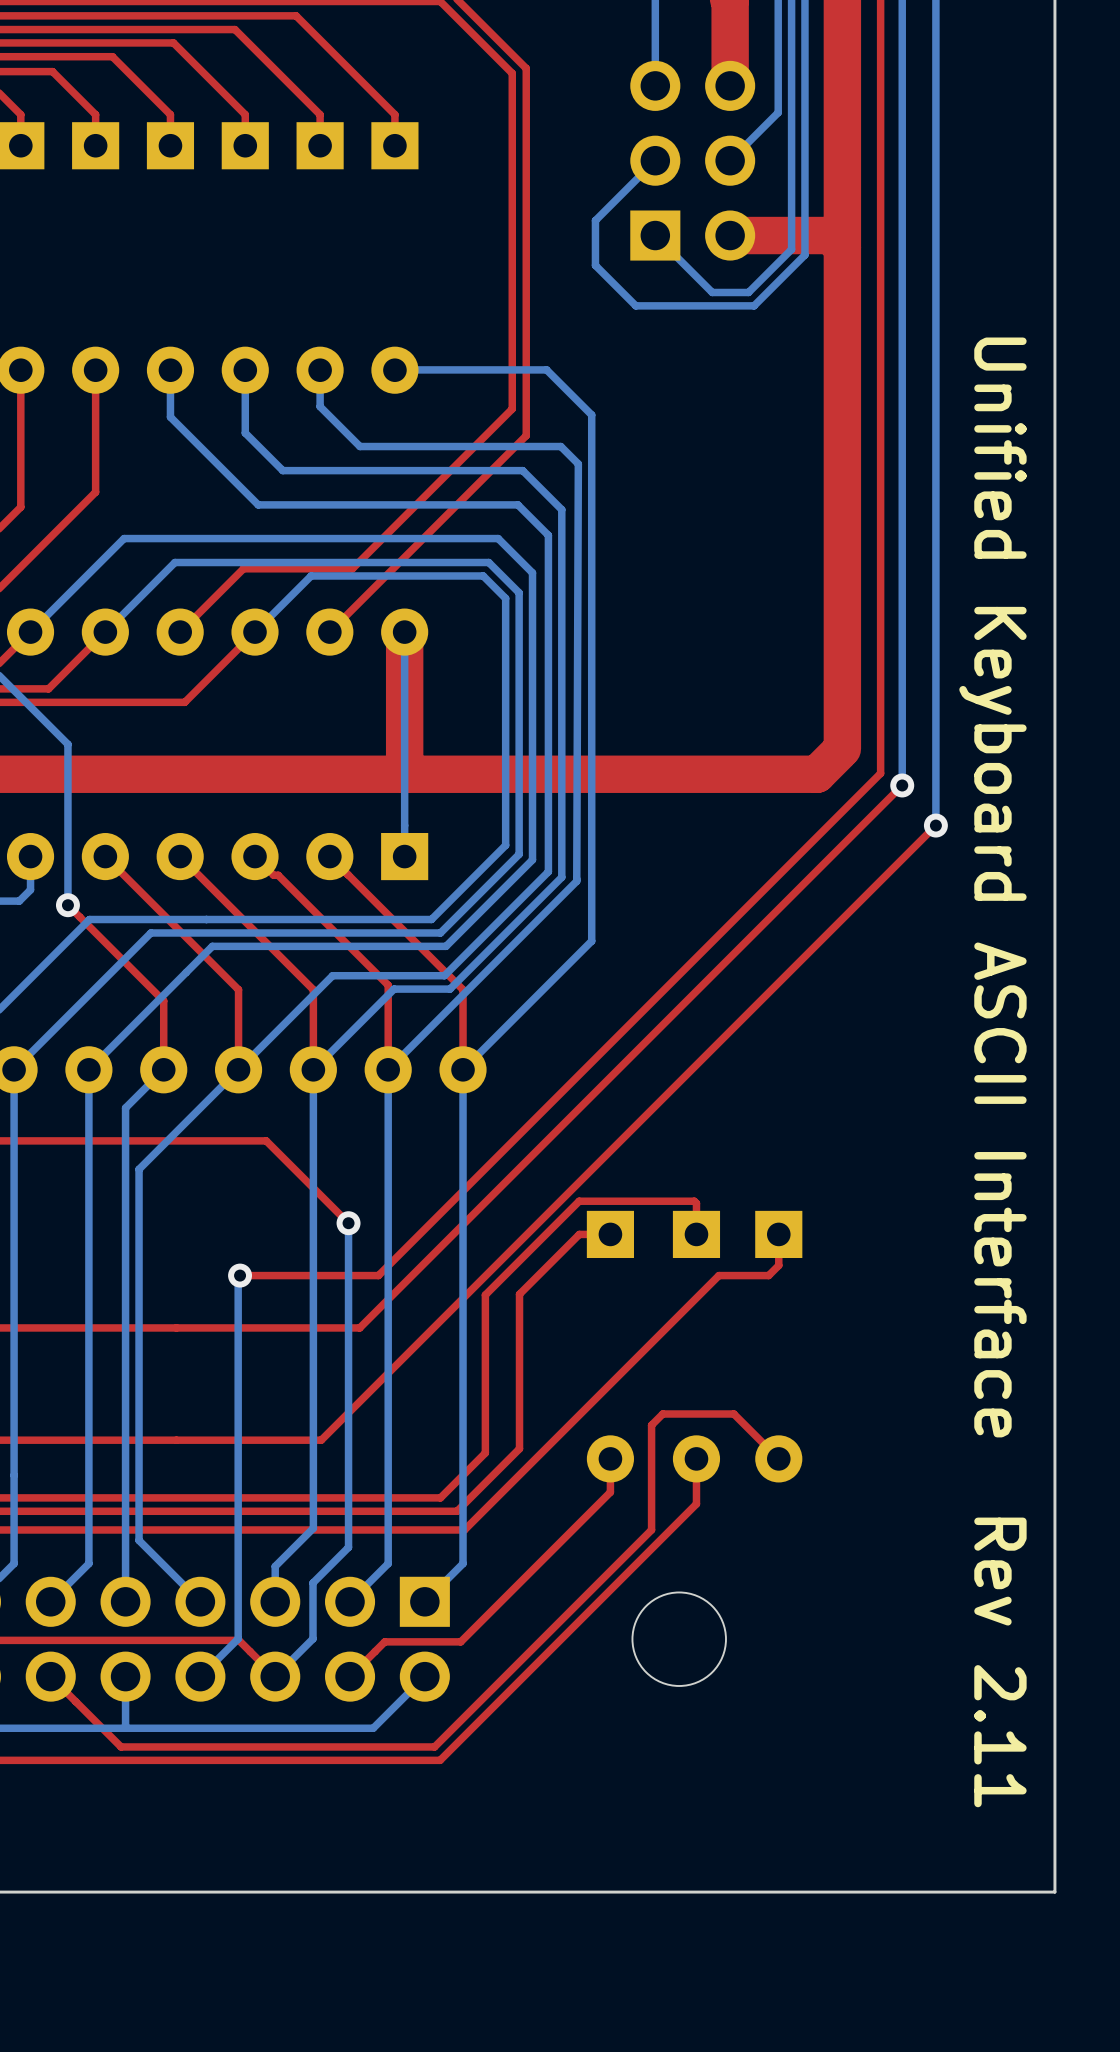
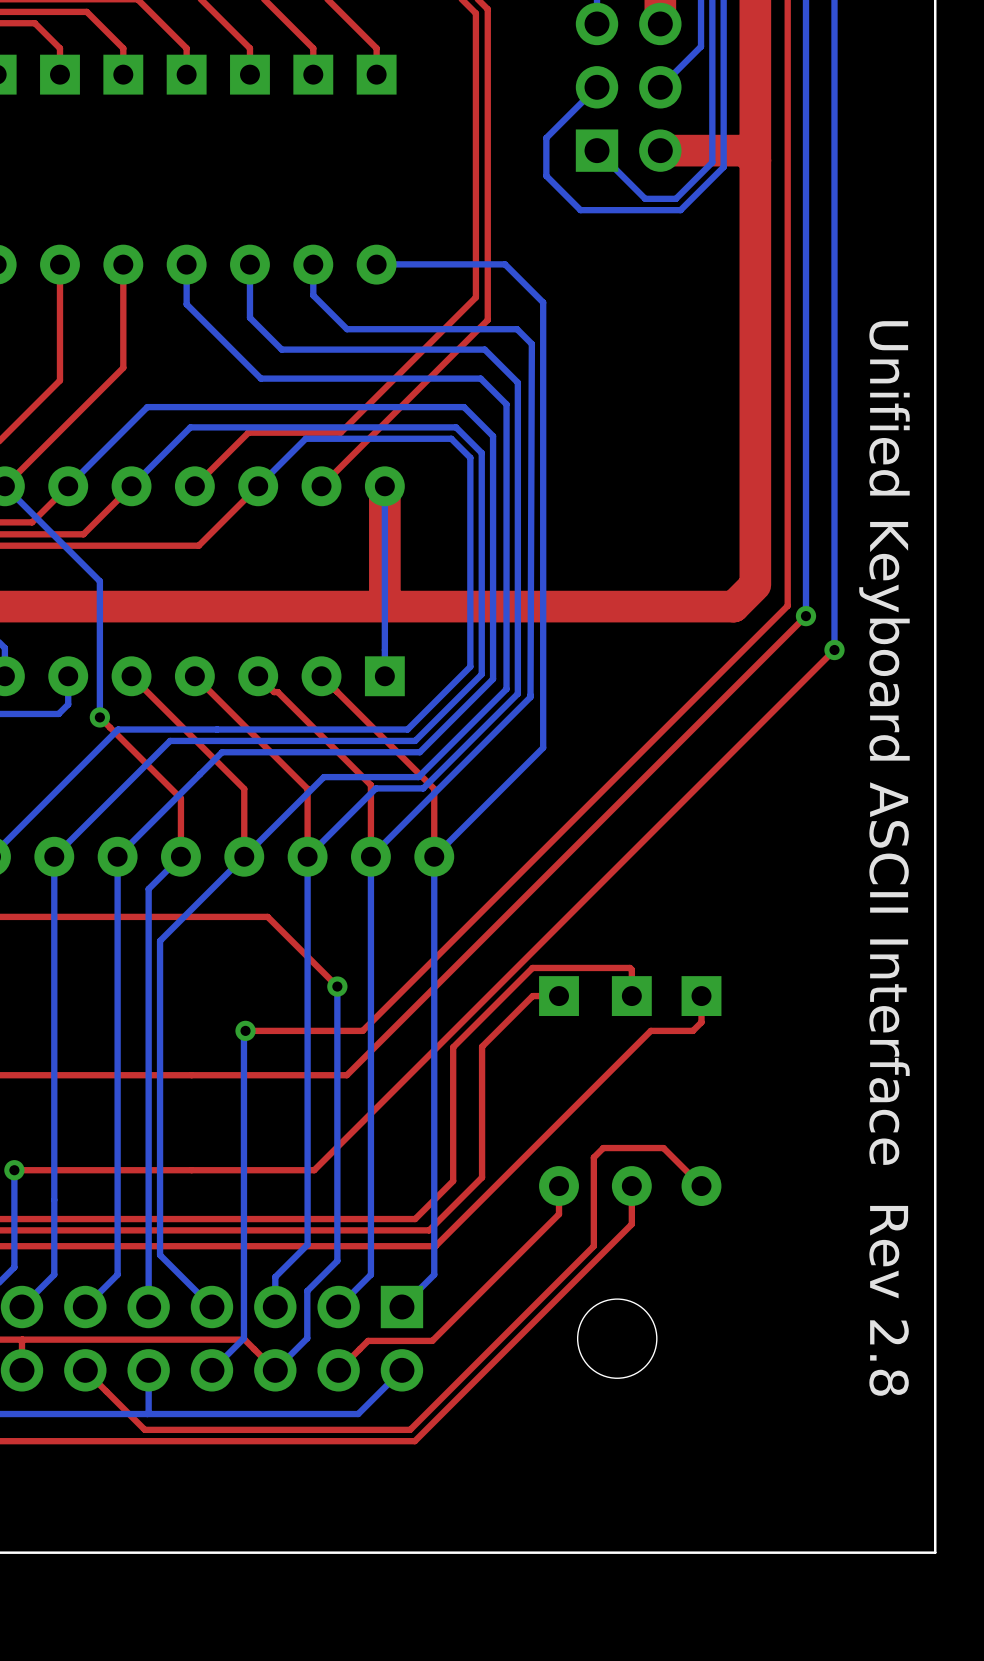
text: Unified Keyboard ASCII Interface Rev 2.11 (992, 1072) -> Unified Keyboard ASCII Interface Rev 2.8 (884, 858)

